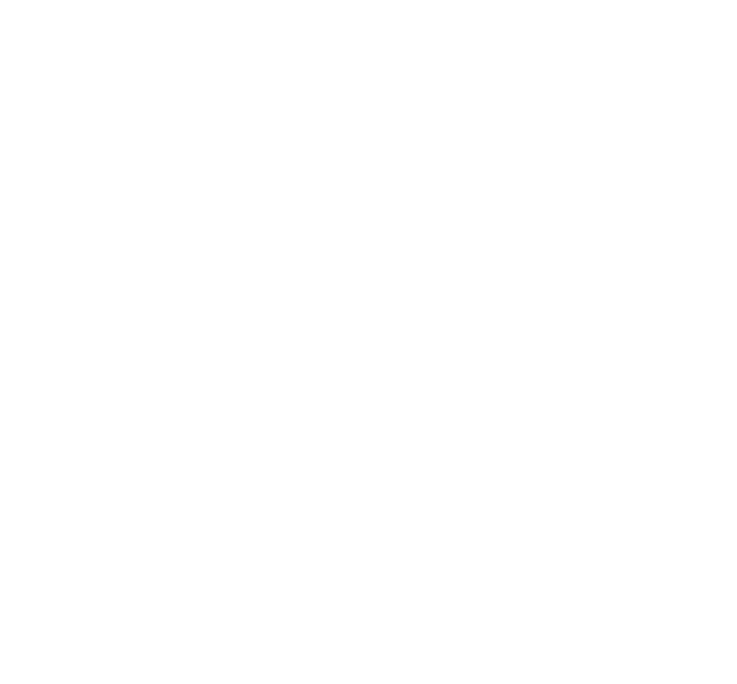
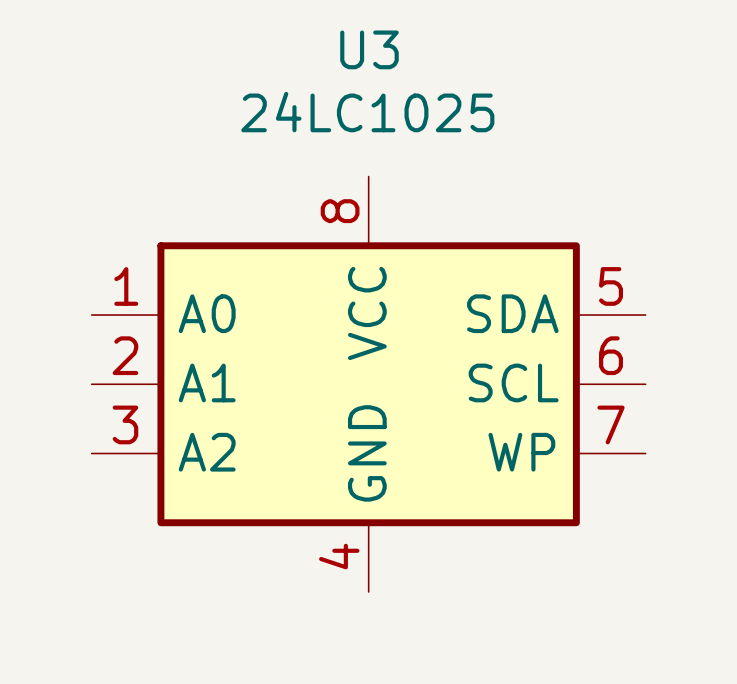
U3: none -> 24LC1025 (368, 384)

